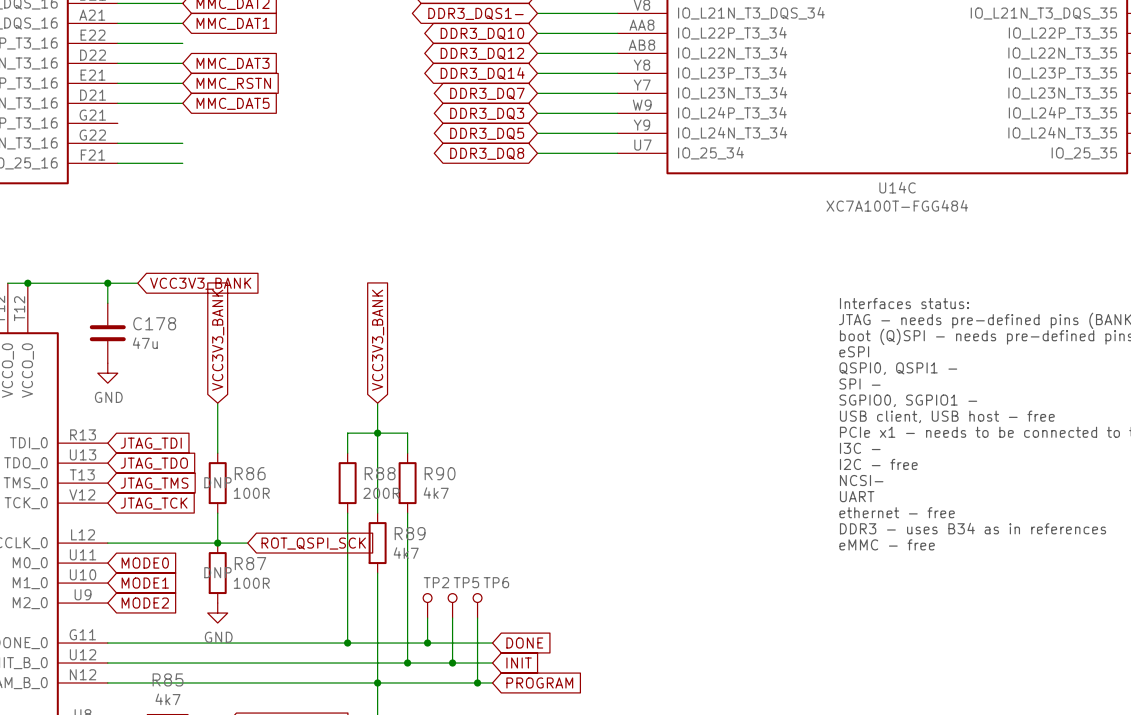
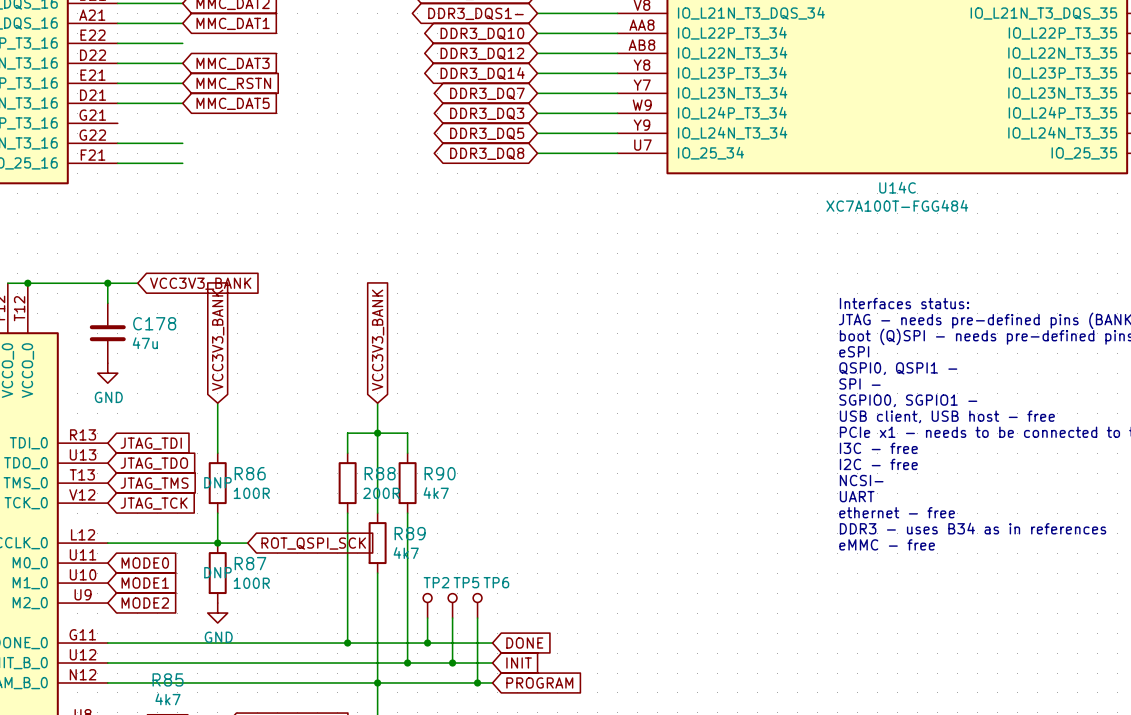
text: I3C - (860, 448) -> I3C - free (878, 448)

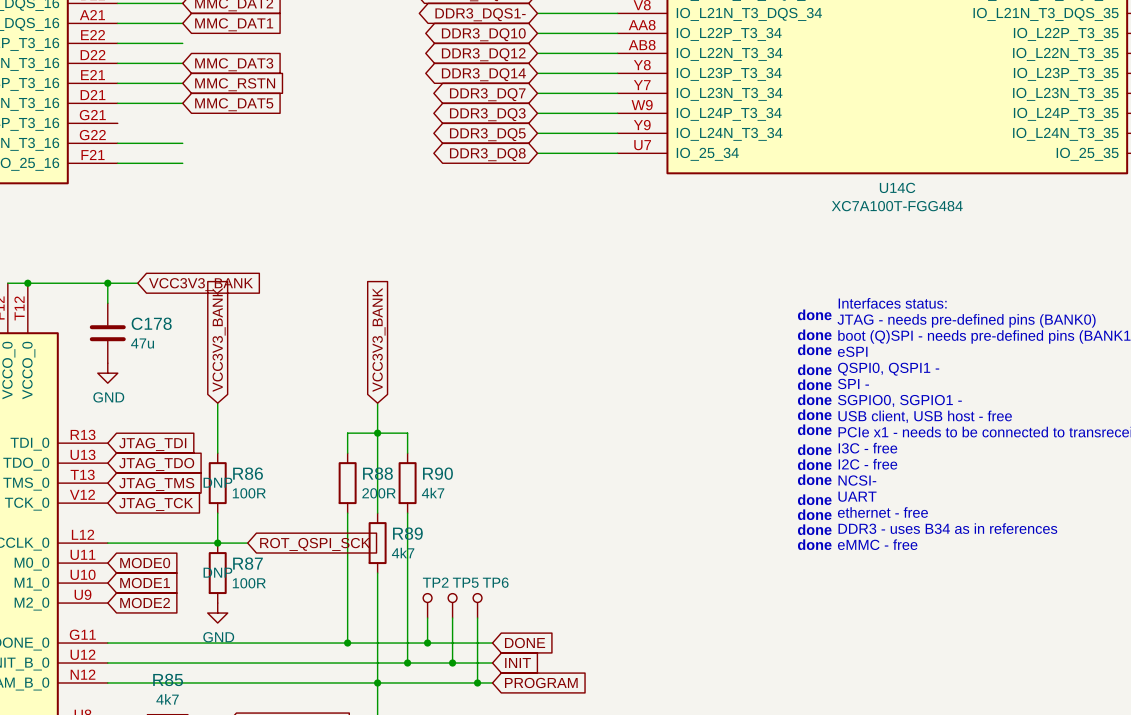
text: none -> done (814, 314)
text: none -> done (814, 334)
text: none -> done (814, 349)
text: none -> done (814, 369)
text: none -> done (814, 384)
text: none -> done (814, 399)
text: none -> done (814, 414)
text: none -> done (814, 429)
text: none -> done (814, 449)
text: none -> done (814, 464)
text: none -> done (814, 479)
text: none -> done (814, 499)
text: none -> done (814, 514)
text: none -> done (814, 529)
text: none -> done (814, 544)

